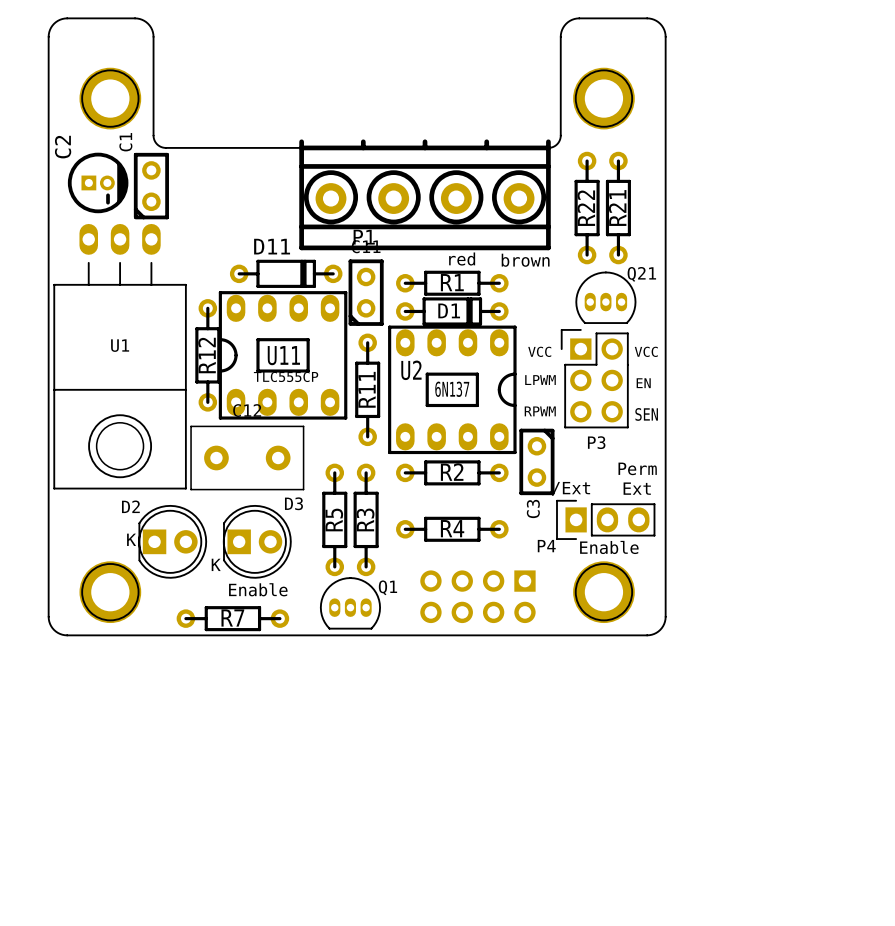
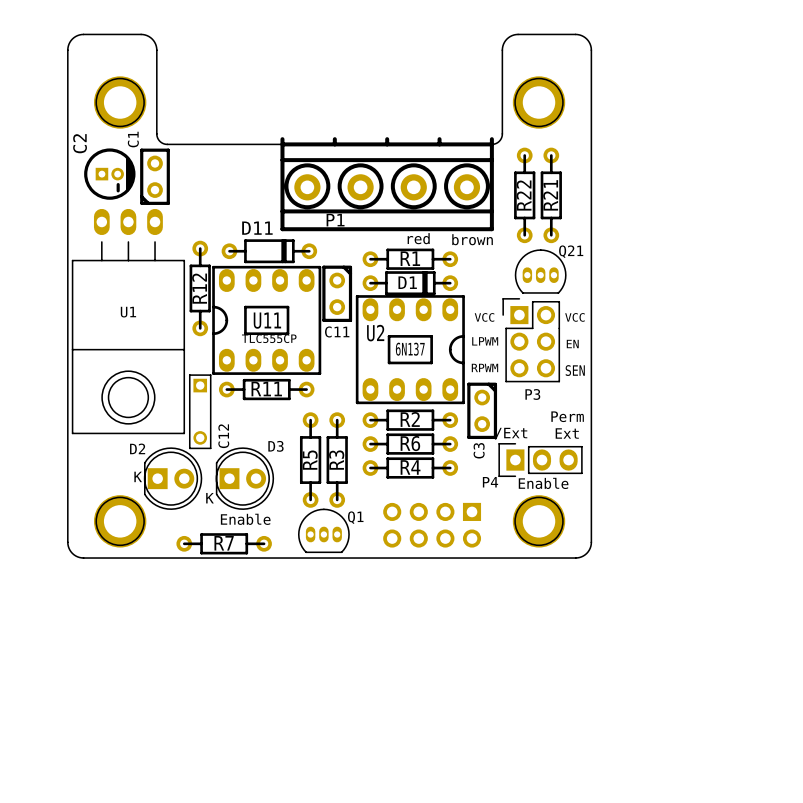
C11 rotation: 0° (366, 292) -> 180° (337, 293)
R12 position: (207, 355) -> (200, 288)
R11 rotation: 0° (367, 389) -> 90° clockwise (266, 389)
R11 position: (367, 389) -> (266, 389)
C12 name position: C12 (247, 410) -> C12 (223, 436)
C12 footprint: [190, 425, 305, 491] -> [188, 374, 212, 450]
R6: none -> (410, 444)

